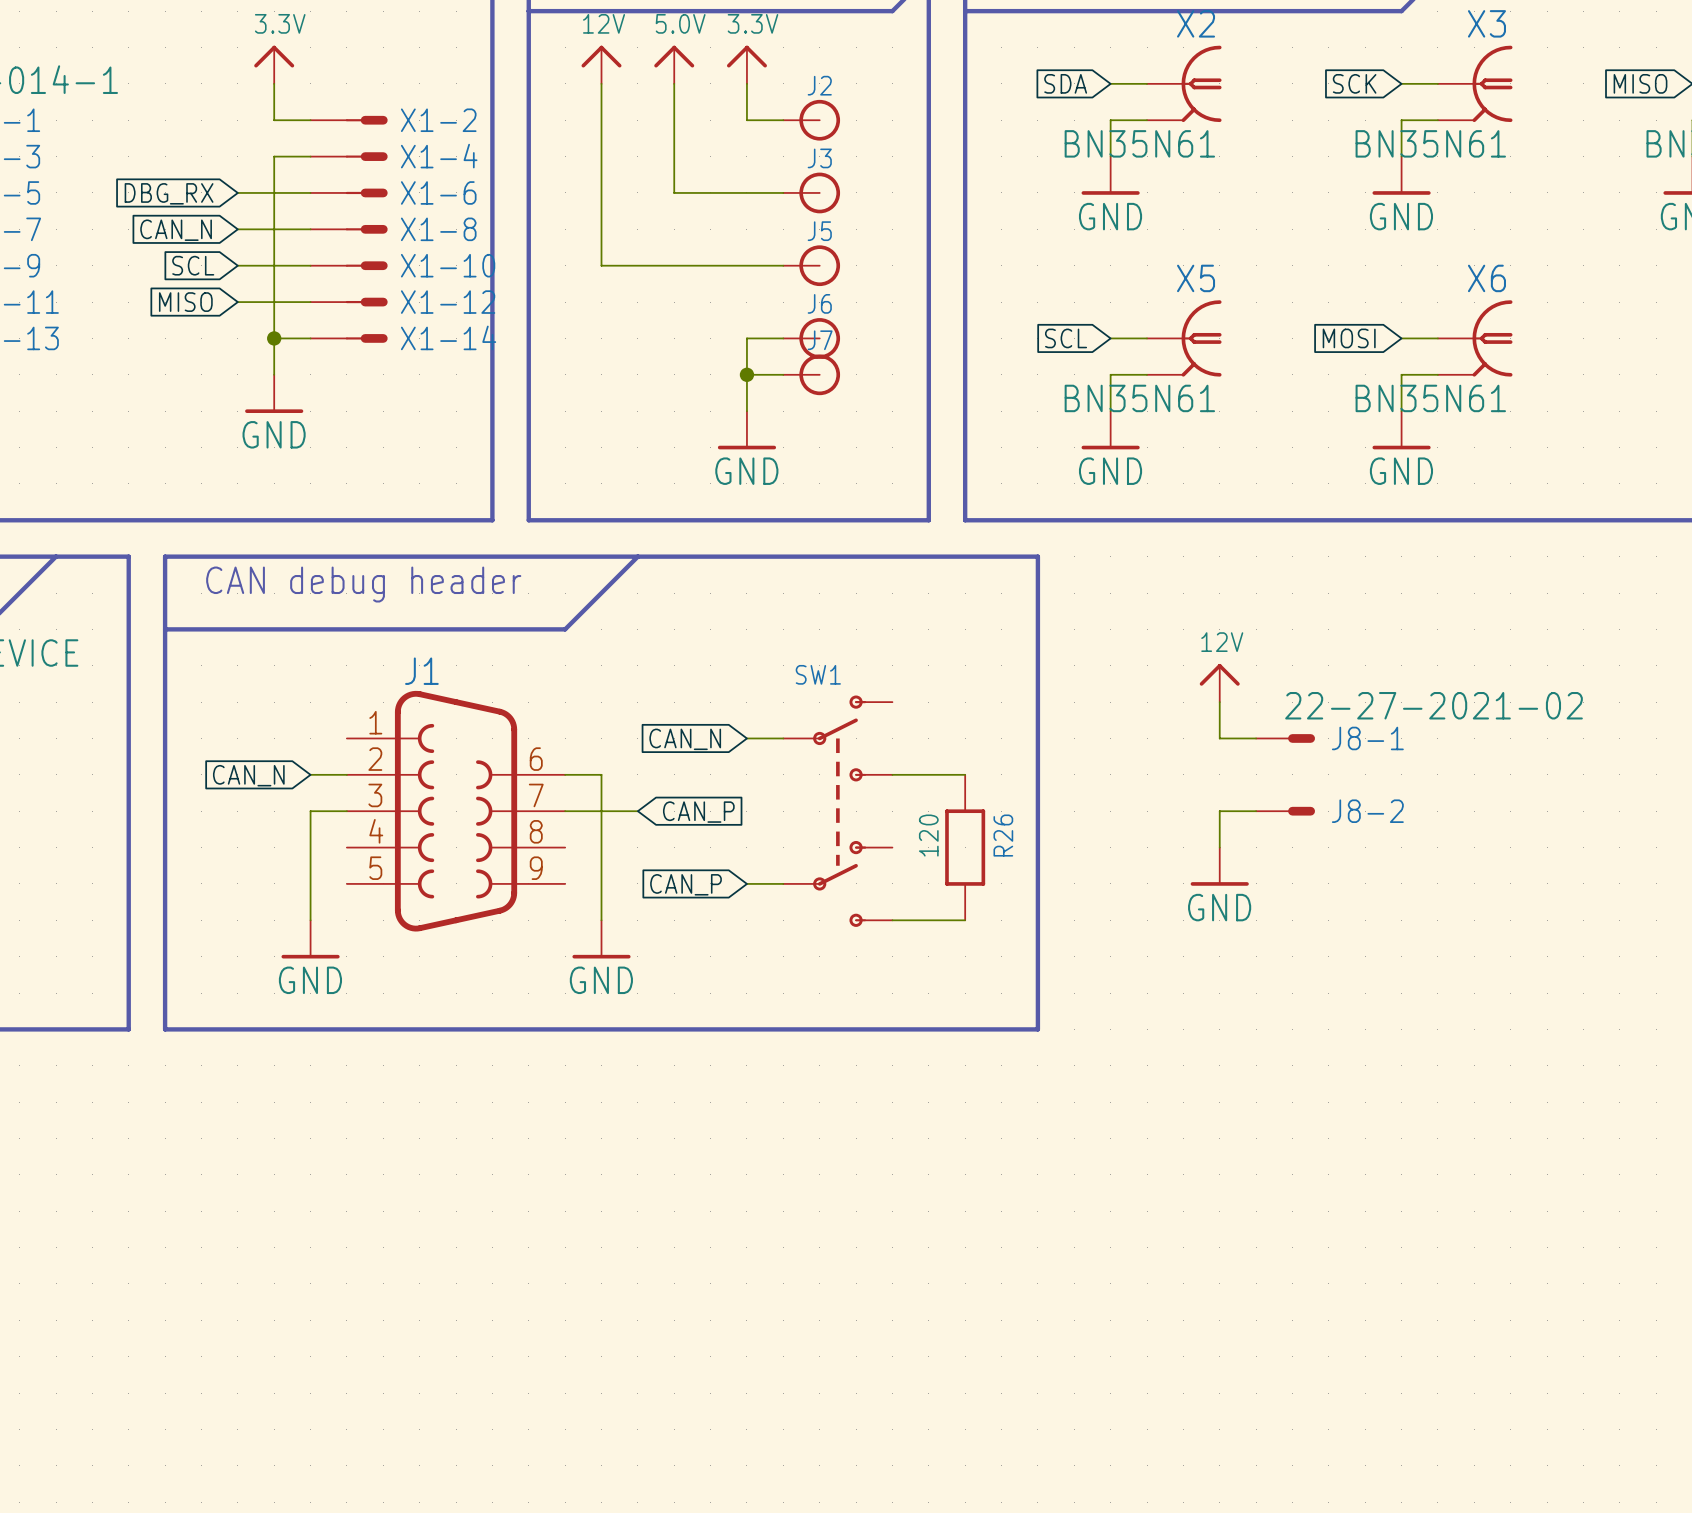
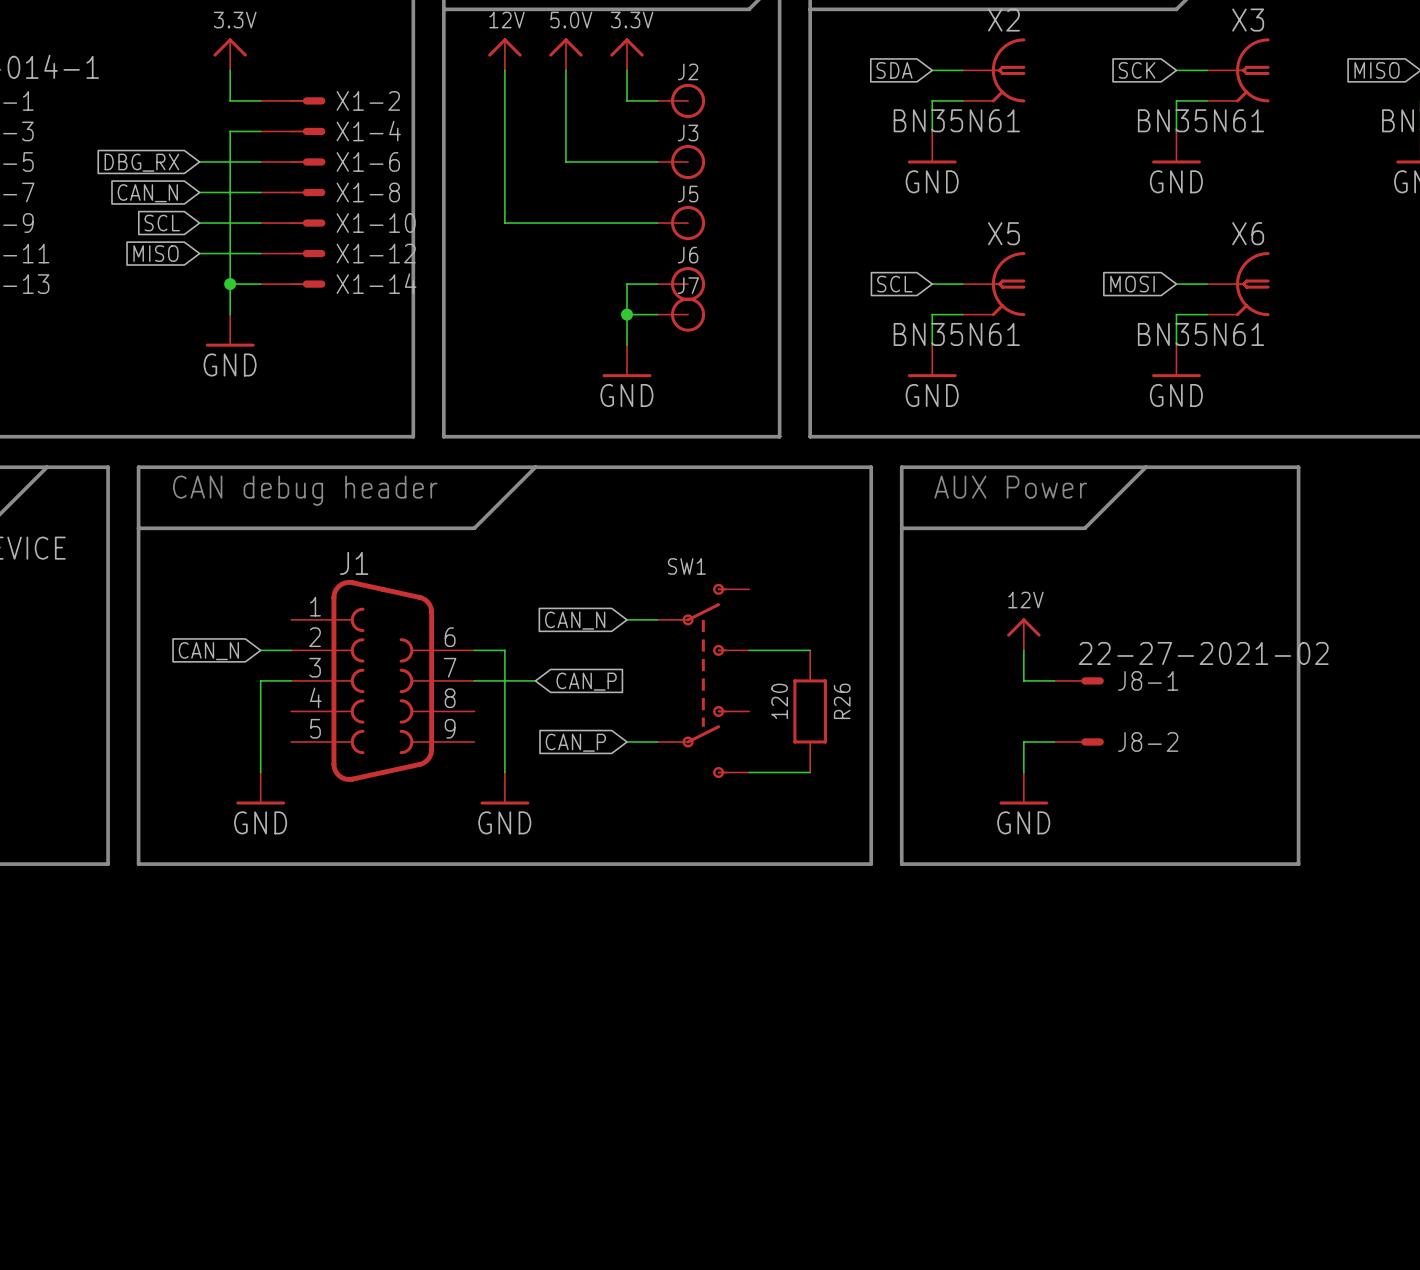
line: none -> (901, 467) (1298, 467) (1298, 864) (901, 864) (901, 467)
line: none -> (1145, 467) (1084, 528) (901, 528)
text: none -> AUX Power (1010, 487)
power symbol position: 12V (1219, 683) -> 12V (1023, 634)
wire: (1219, 702) (1219, 738) (1256, 738) -> none
J8-1: 22-27-2021-02 (1285, 738) -> none
J8-2 value: none -> 22-27-2021-02 (1203, 653)
wire: (1219, 811) (1219, 847) -> (1023, 680) (1023, 650)
J8-2 name: J8-2 (1367, 811) -> J8-1 (1148, 680)
power symbol position: GND (1219, 866) -> GND (1023, 788)
wire: none -> (1054, 741) (1023, 741) (1023, 772)
J8-2: none -> (1079, 741)

